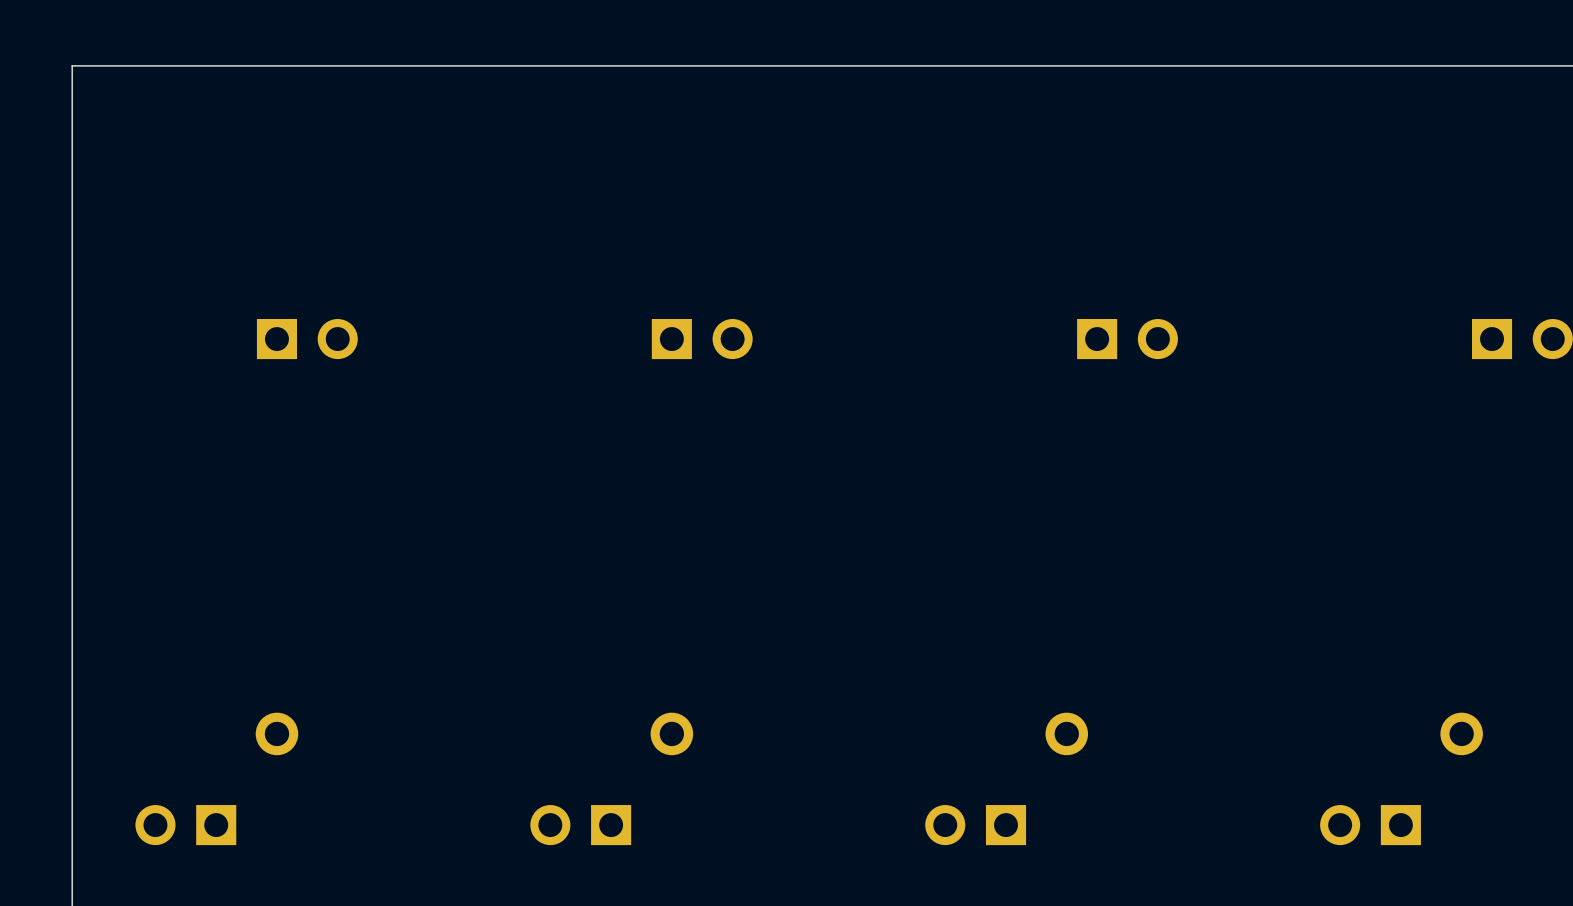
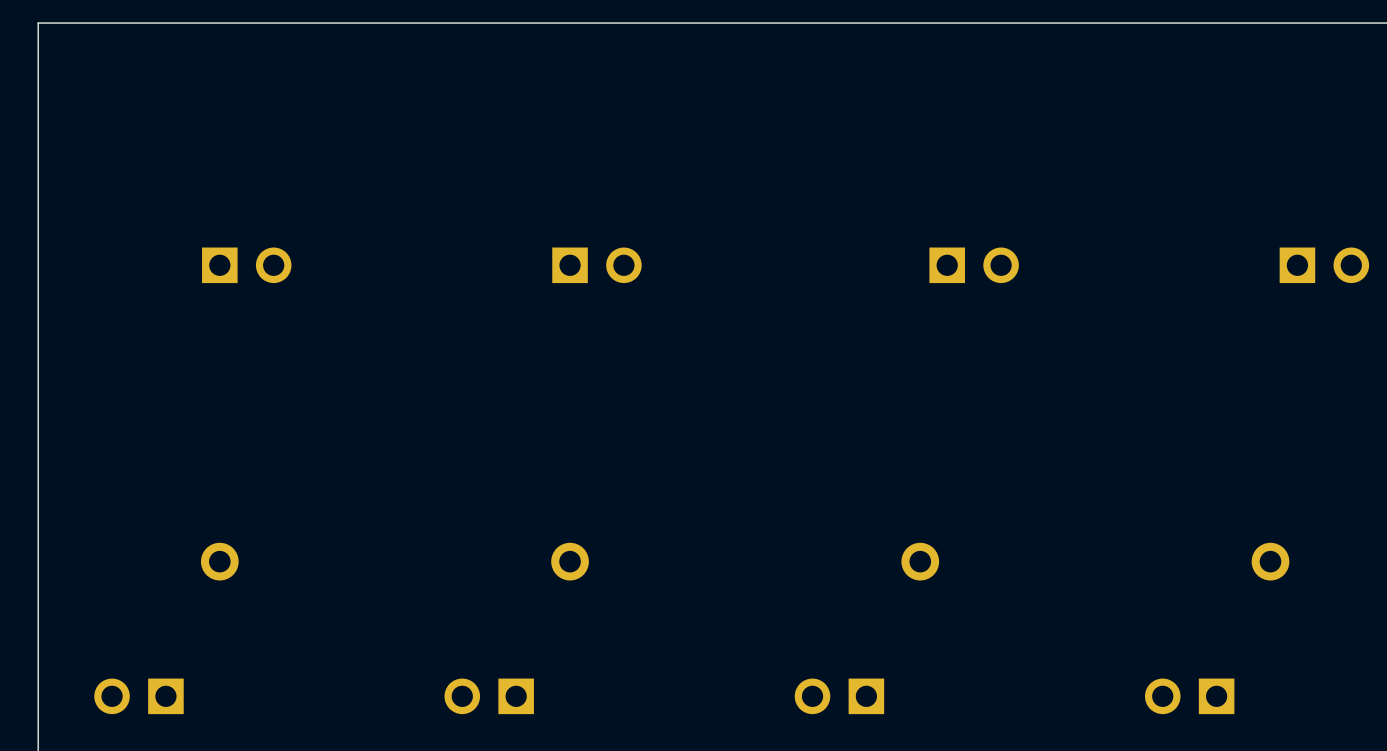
part position: (276, 733) -> (219, 561)
part position: (671, 733) -> (570, 561)
part position: (1066, 733) -> (920, 561)
part position: (1461, 733) -> (1270, 561)

